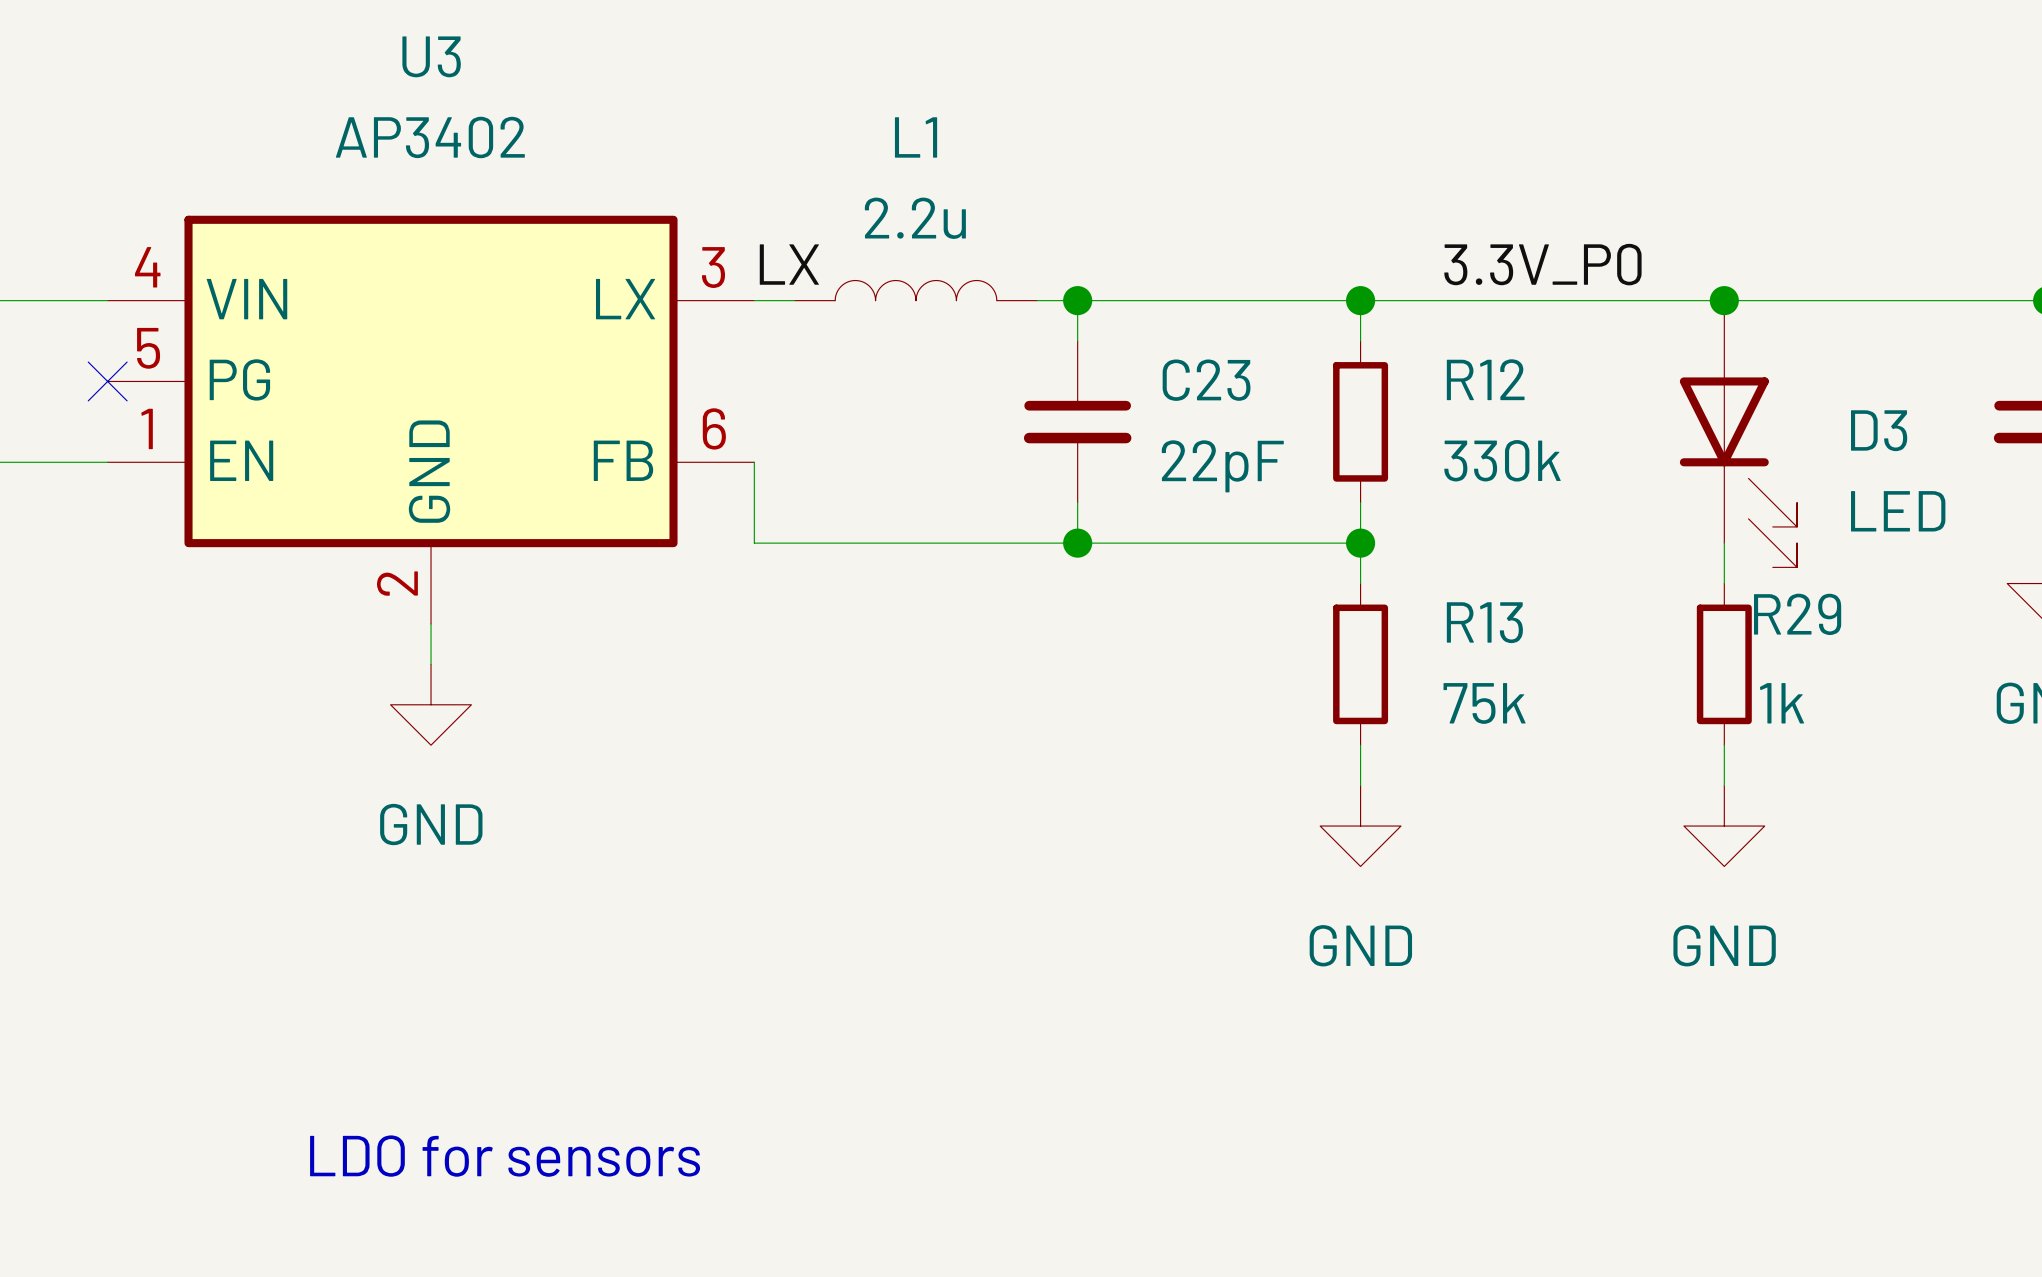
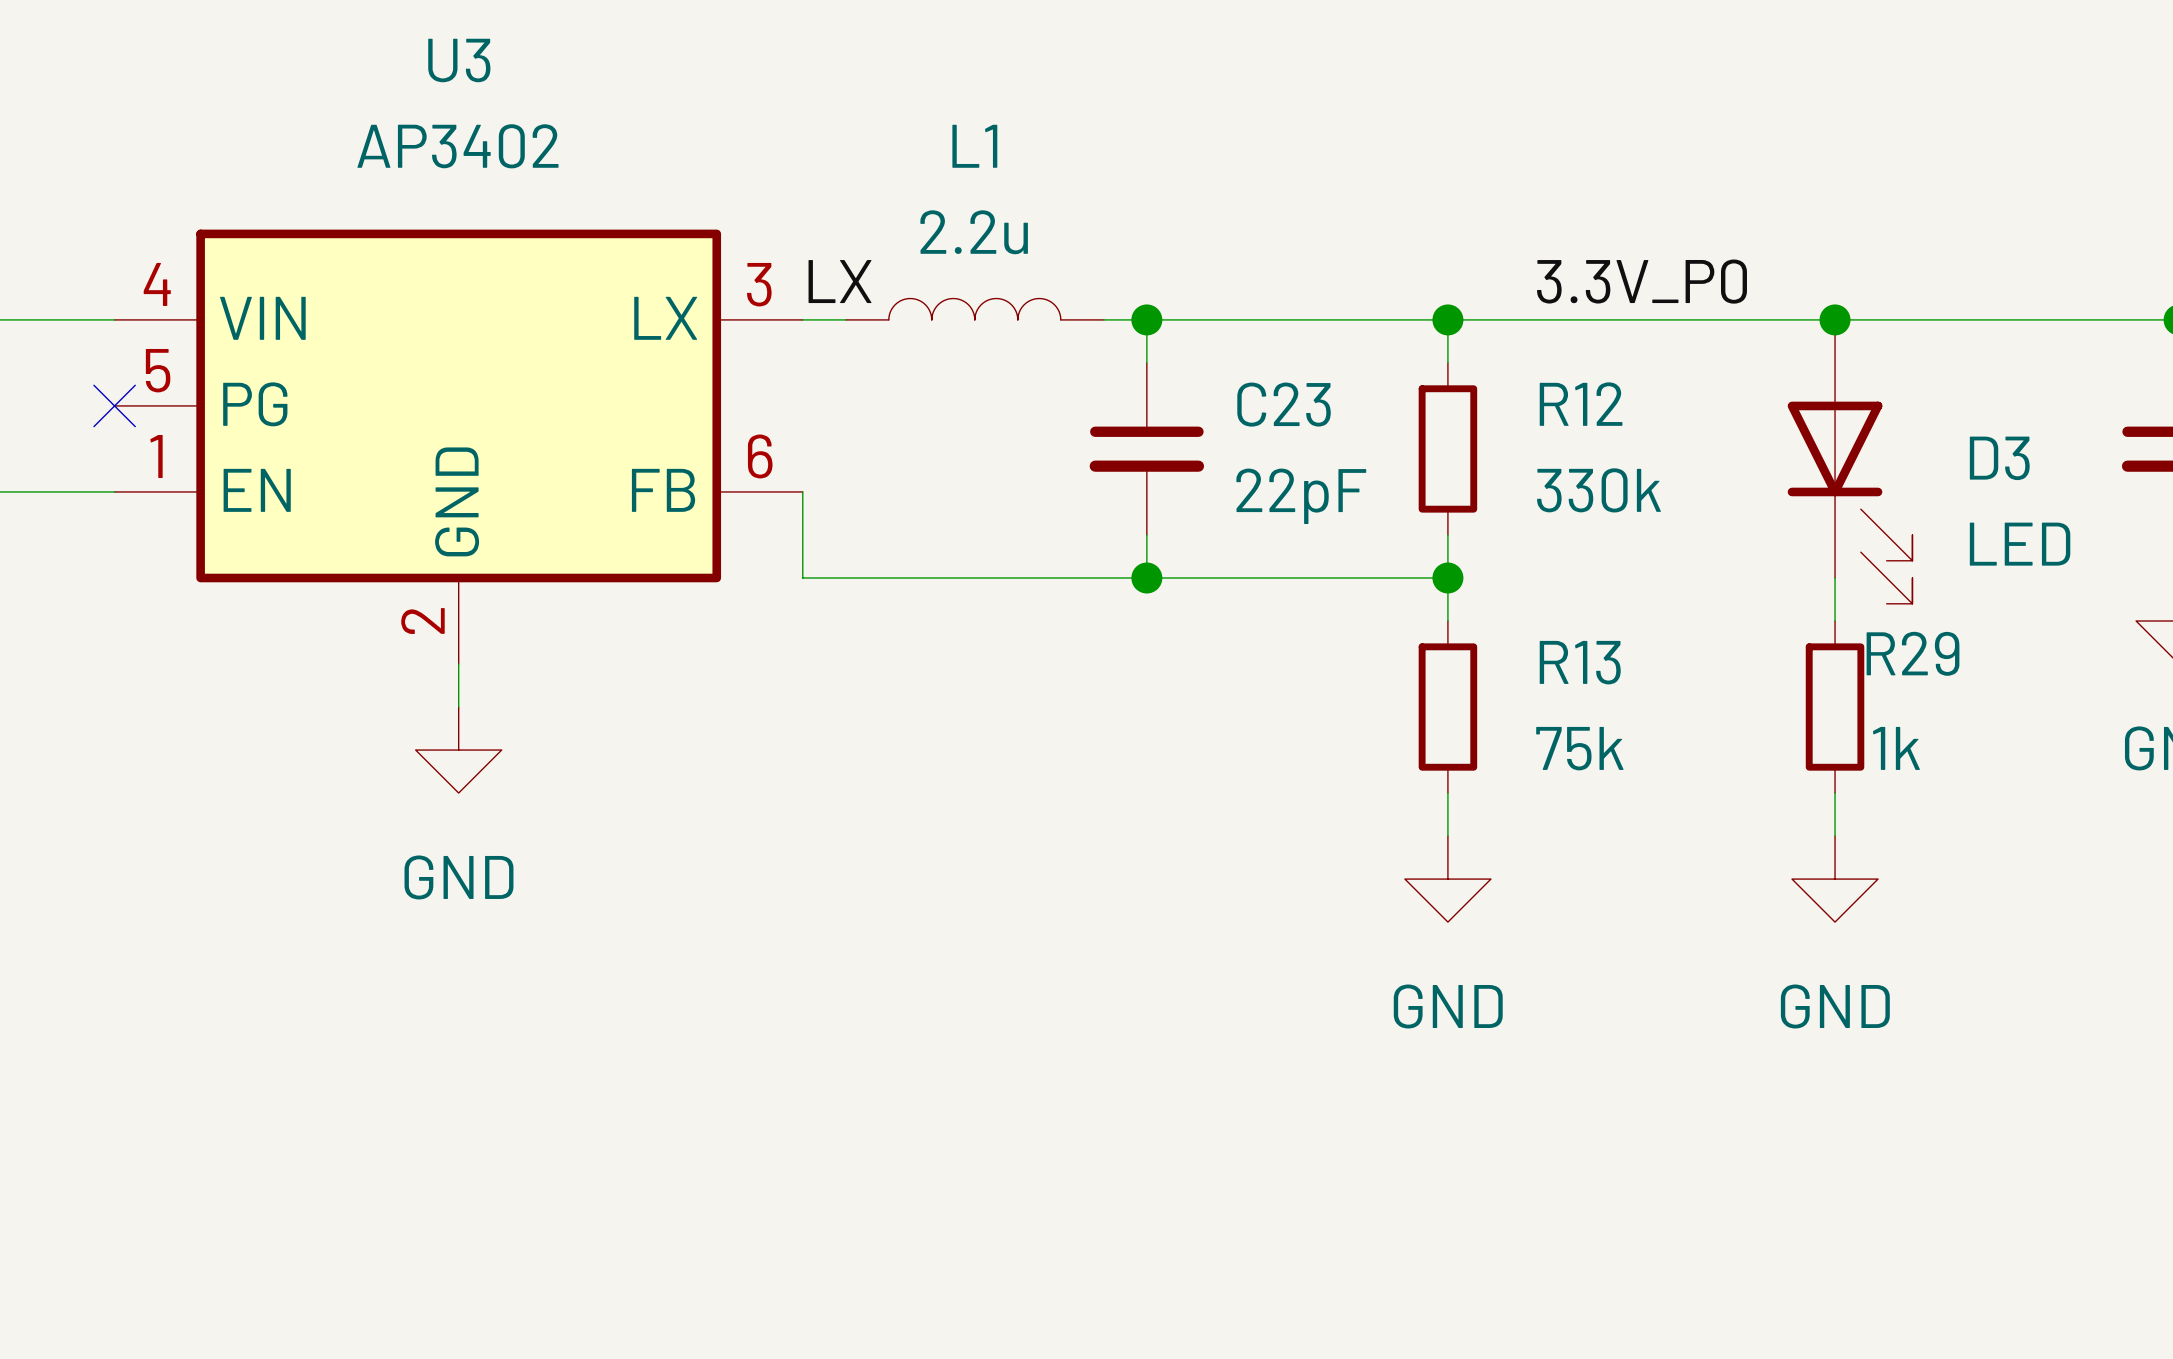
text: LDO for sensors (505, 1156) -> none

